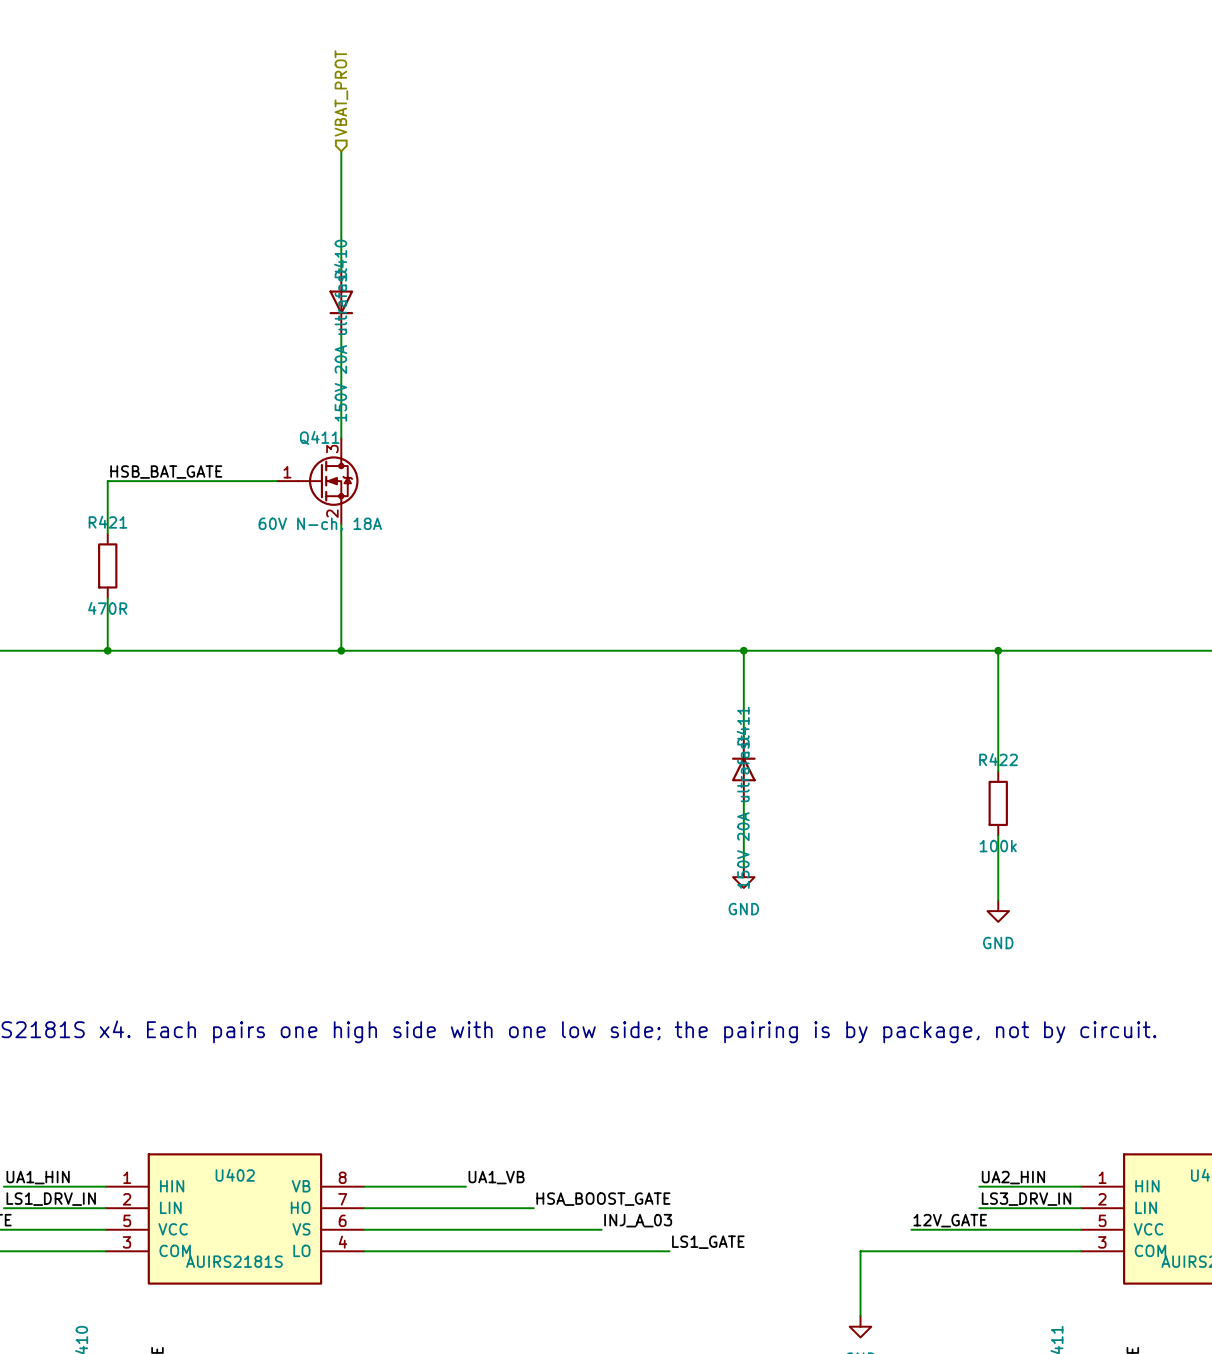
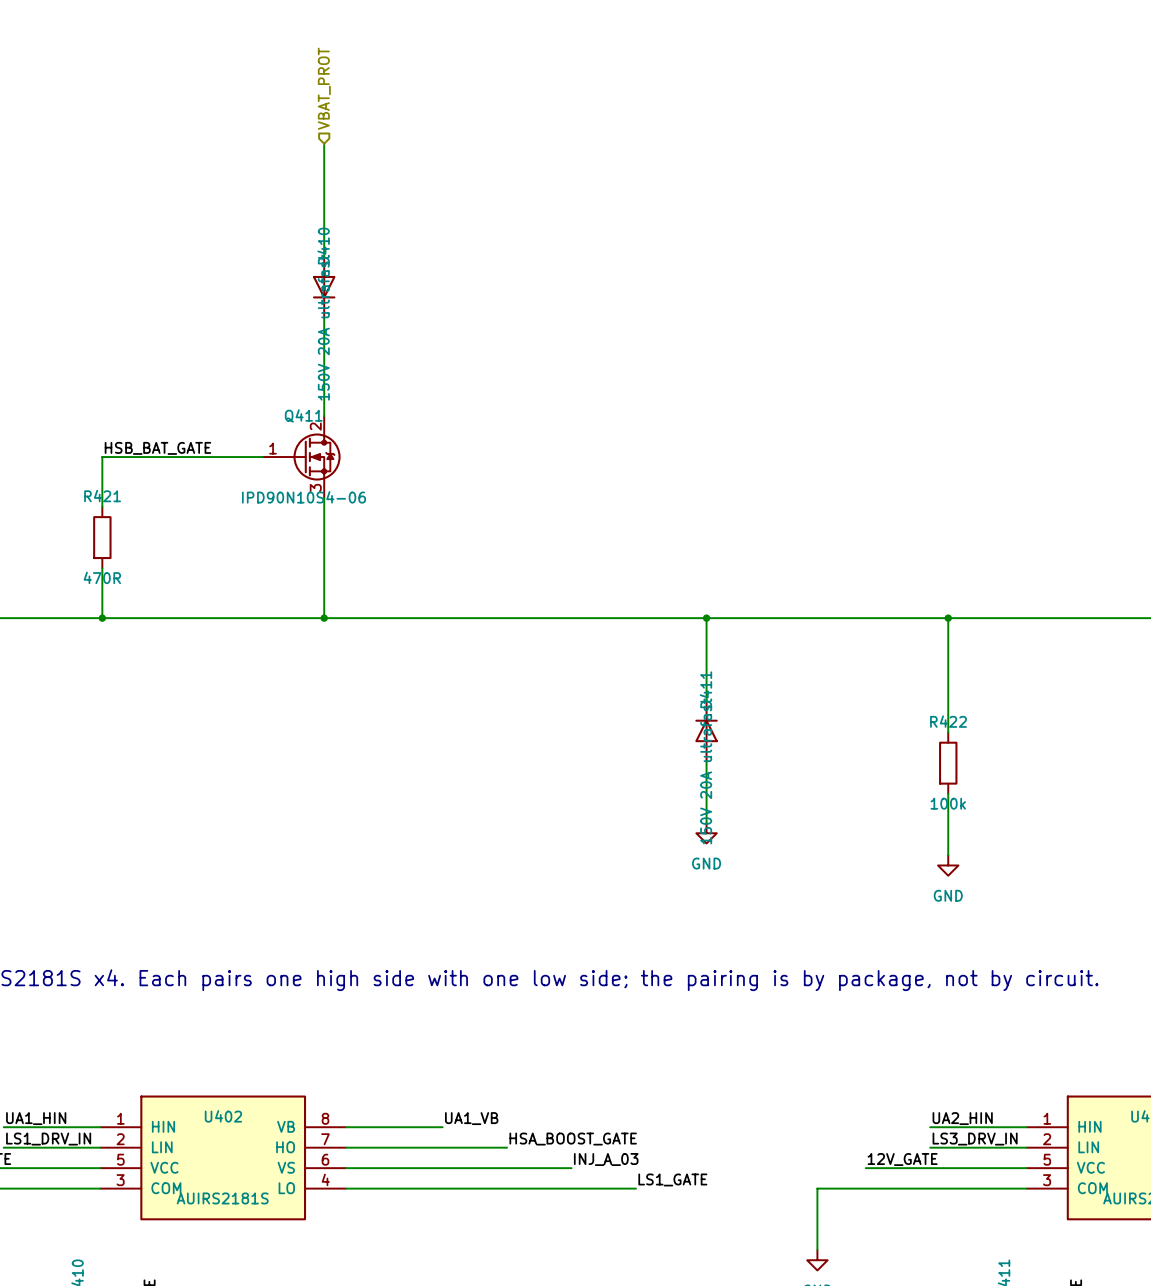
Q411 pin number: 3 (332, 449) -> 2 (315, 426)
Q411 pin number: 2 (332, 513) -> 3 (315, 487)
Q411 value: 60V N-ch, 18A (320, 524) -> IPD90N10S4-06 (303, 497)

